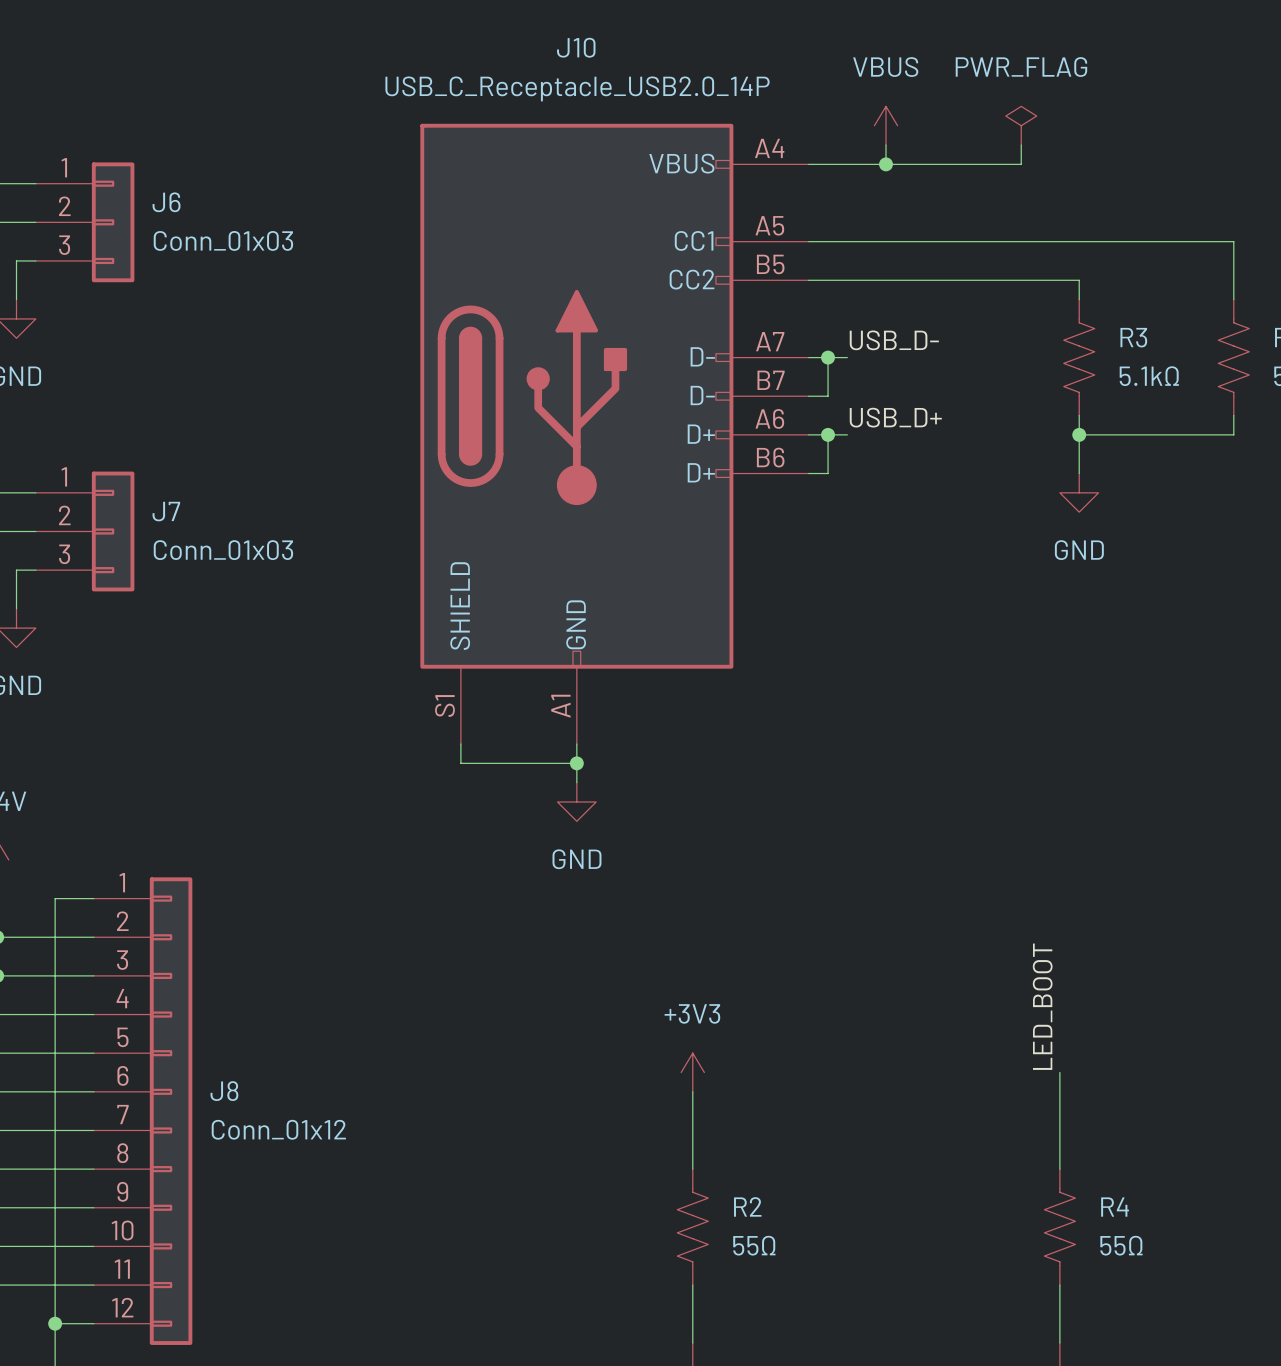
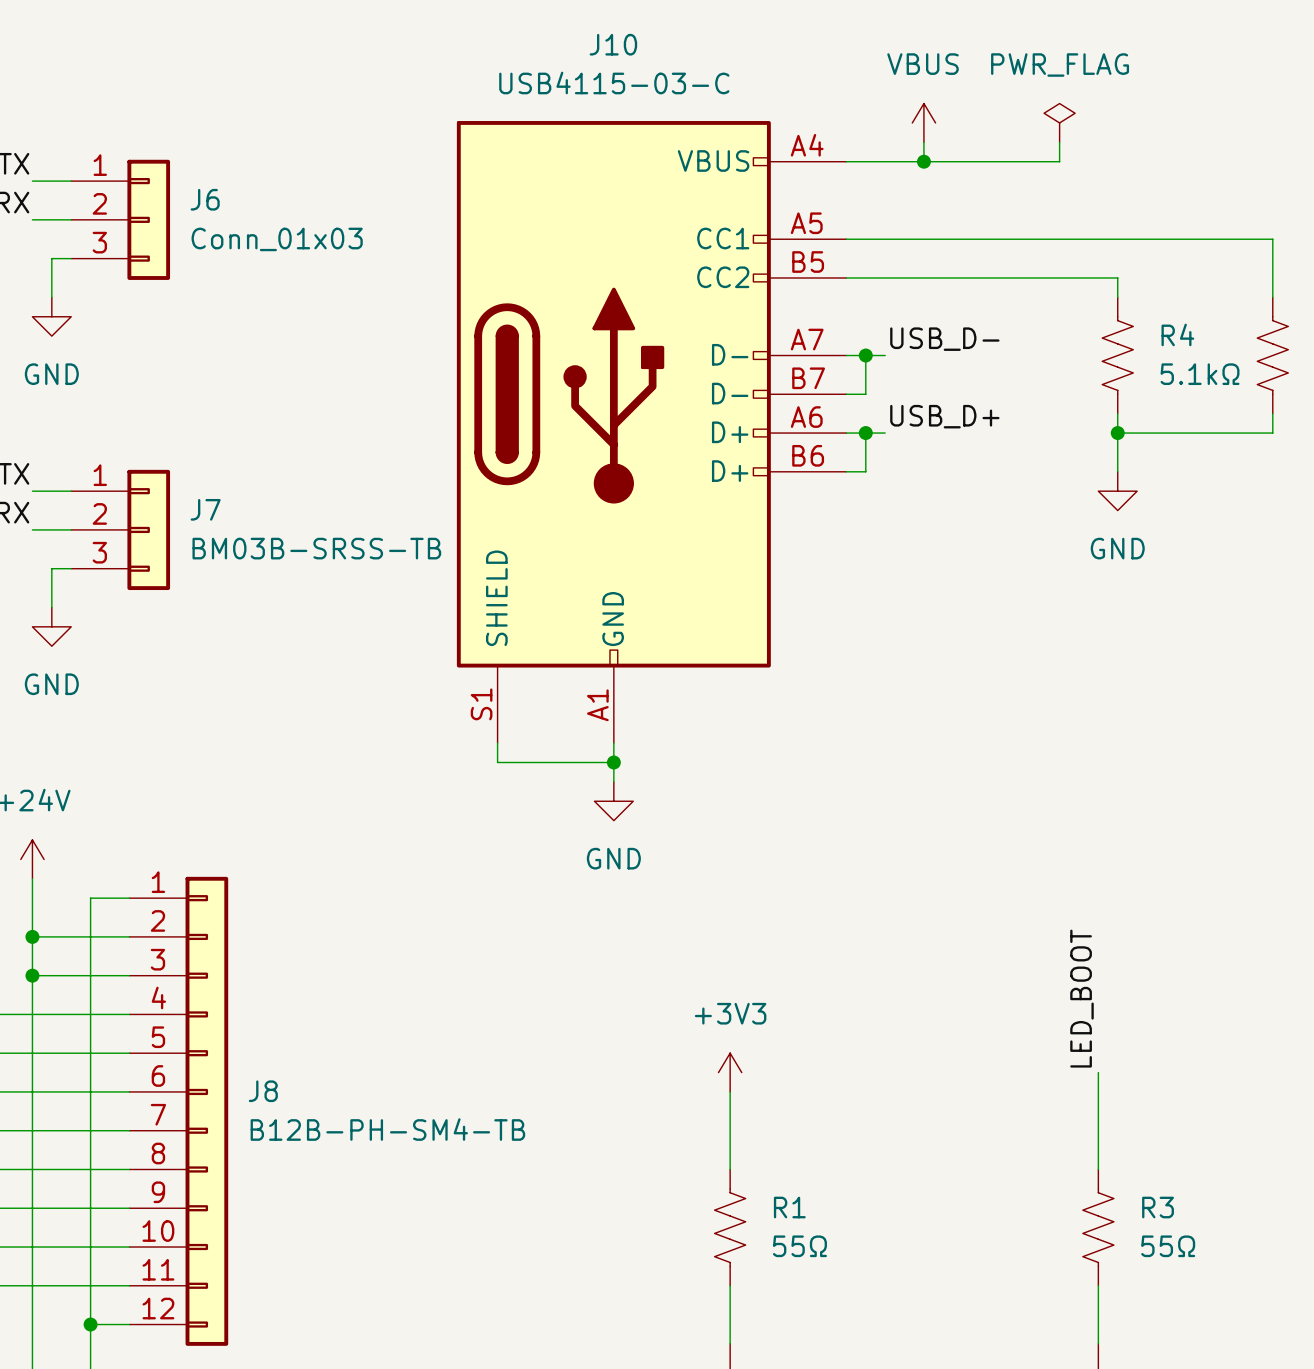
J10 value: USB_C_Receptacle_USB2.0_14P (577, 88) -> USB4115-03-C (614, 83)
R3 name: R3 (1133, 337) -> R4 (1177, 334)
J7 value: Conn_01x03 (223, 550) -> BM03B-SRSS-TB (316, 548)
J8 value: Conn_01x12 (278, 1129) -> B12B-PH-SM4-TB (387, 1129)
R2 name: R2 (747, 1206) -> R1 (789, 1207)
R4 name: R4 (1115, 1207) -> R3 (1158, 1207)

